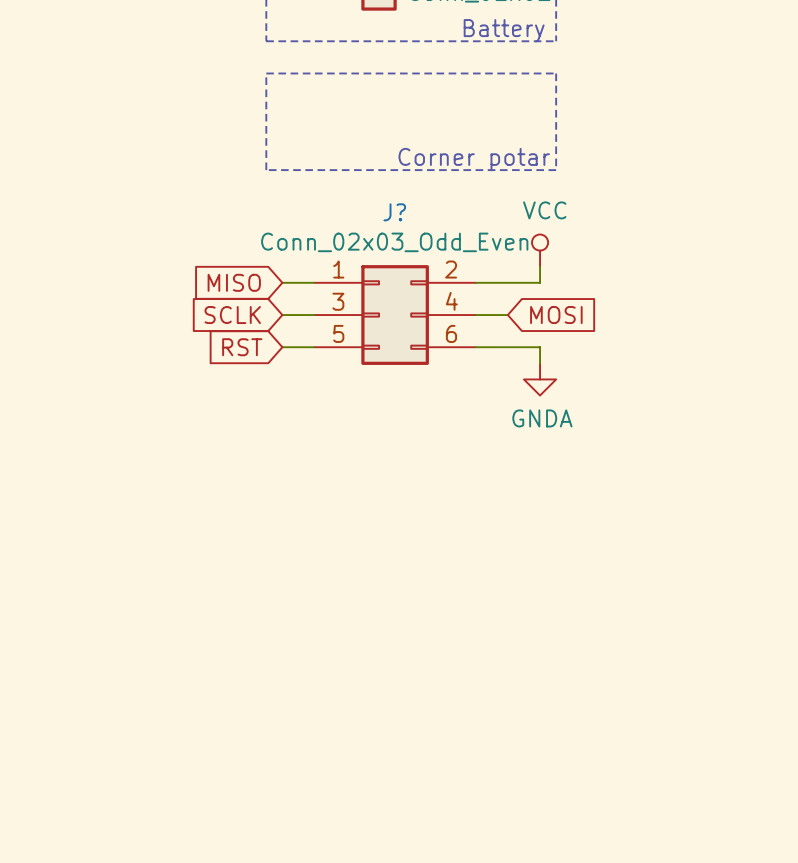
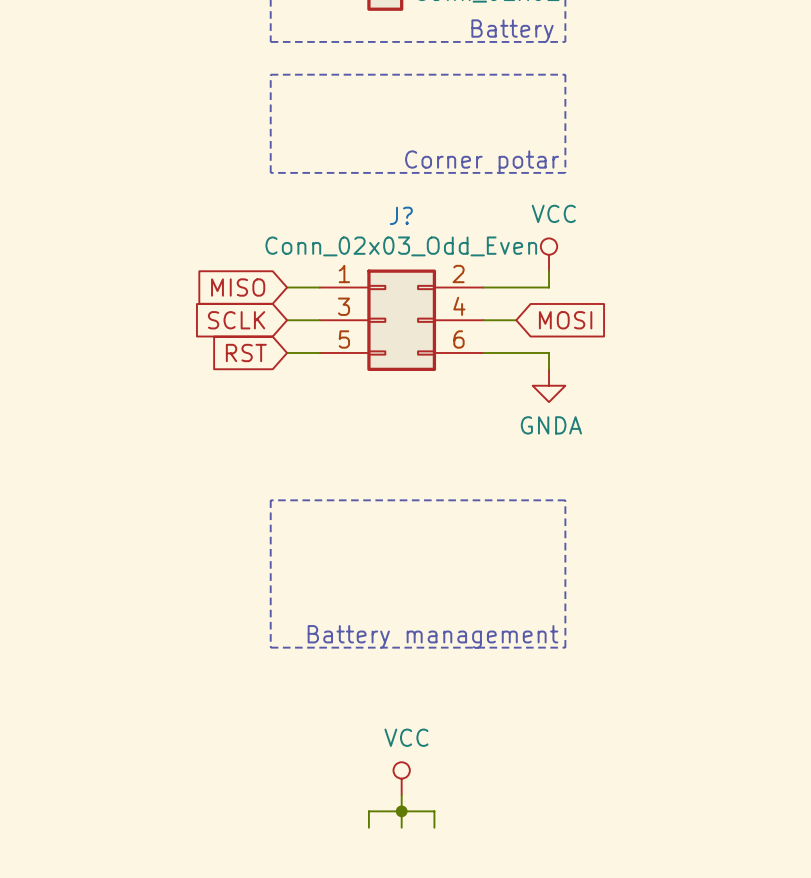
line: none -> (270, 500) (565, 500) (565, 647) (270, 647) (270, 500)
text: none -> Battery management (432, 636)
power symbol: none -> VCC (401, 778)
wire: none -> (401, 794) (401, 827)
junction: none -> (401, 811)
wire: none -> (368, 827) (368, 811) (434, 811) (434, 827)

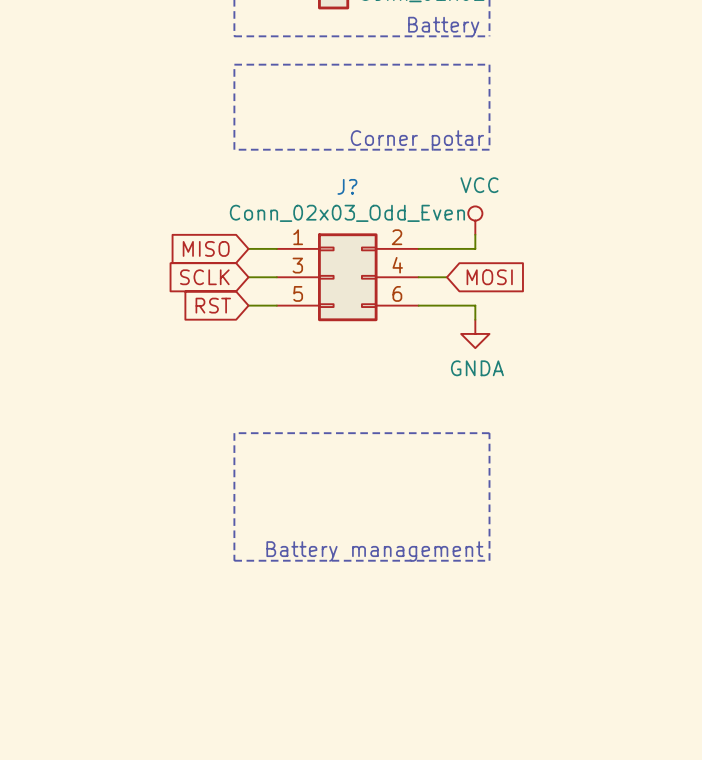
power symbol: VCC (401, 778) -> none
wire: (401, 794) (401, 827) -> none
junction: (401, 811) -> none
wire: (368, 827) (368, 811) (434, 811) (434, 827) -> none

